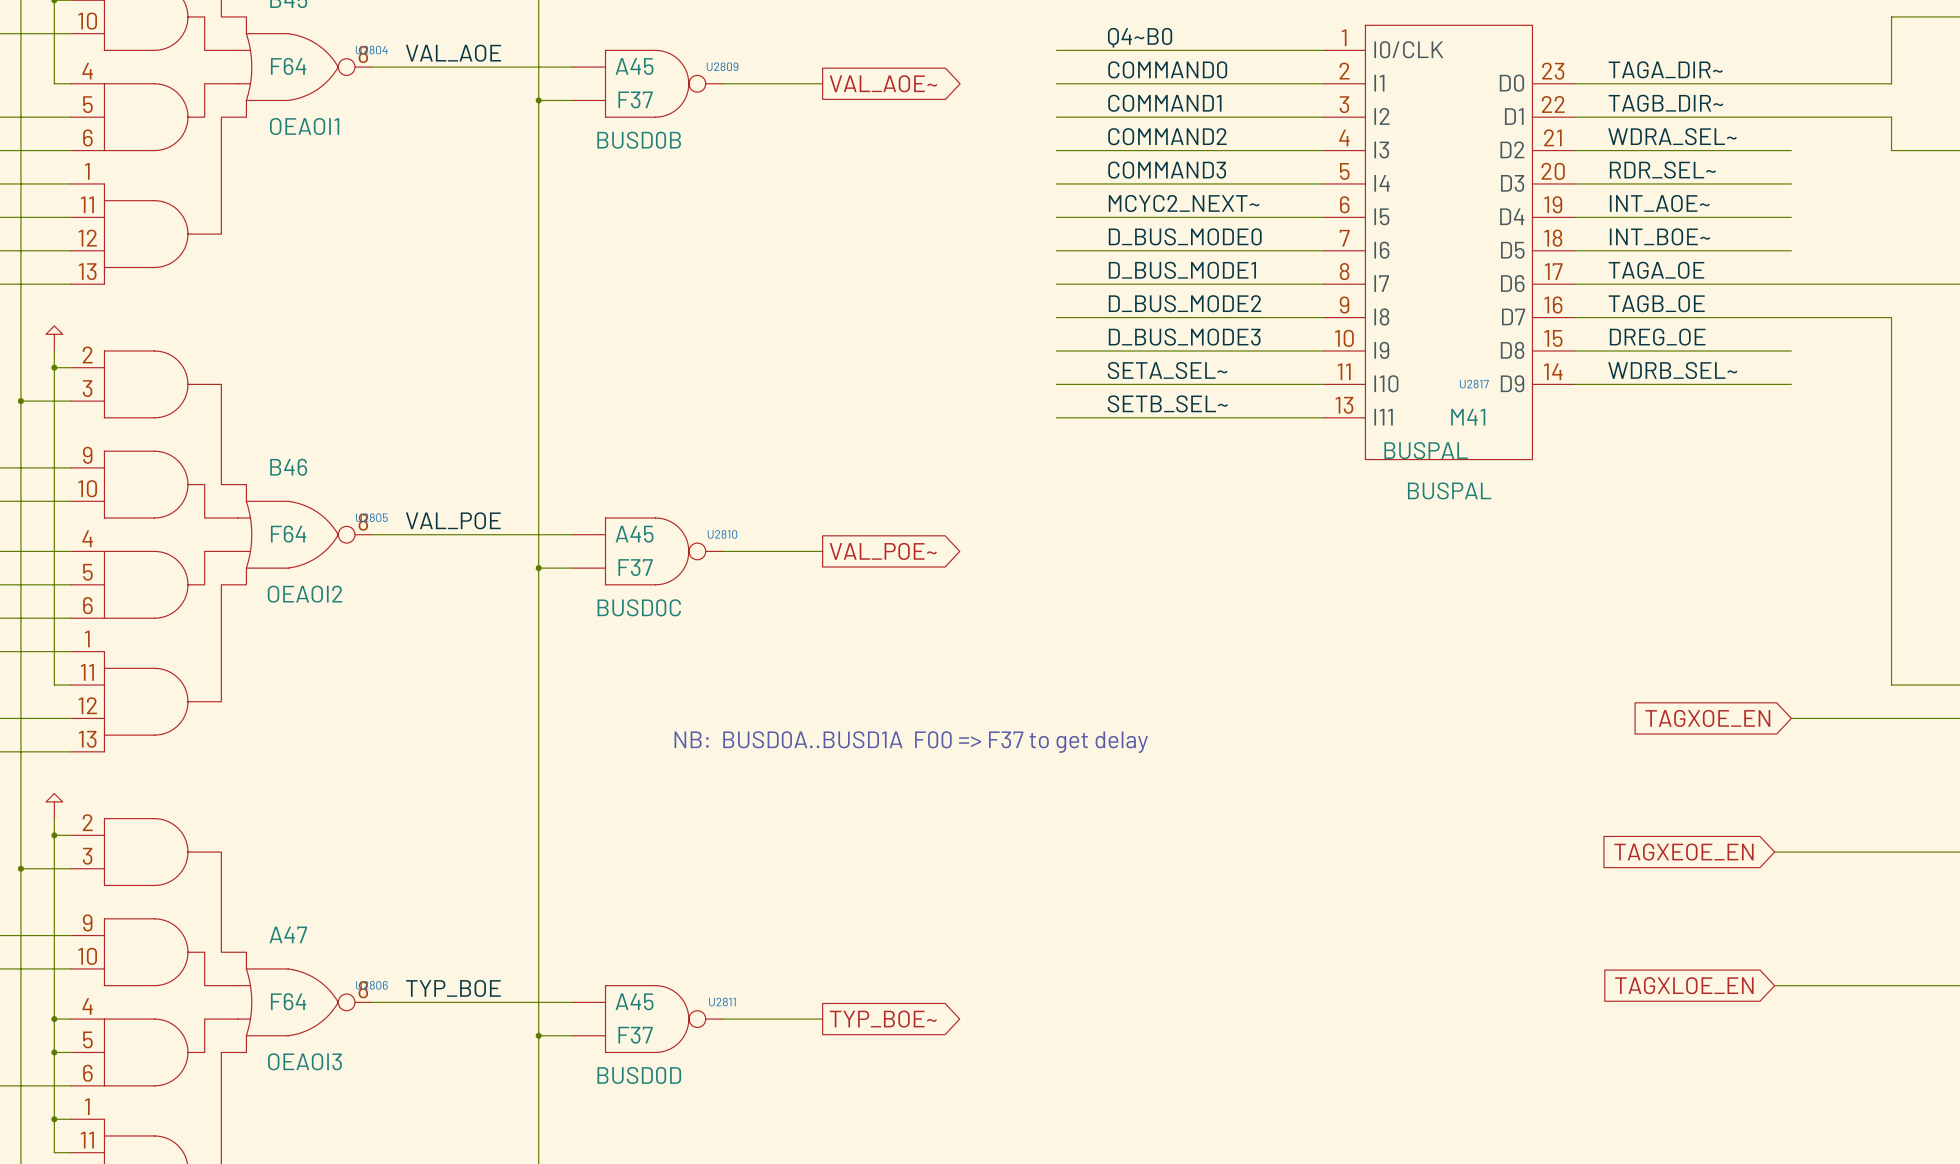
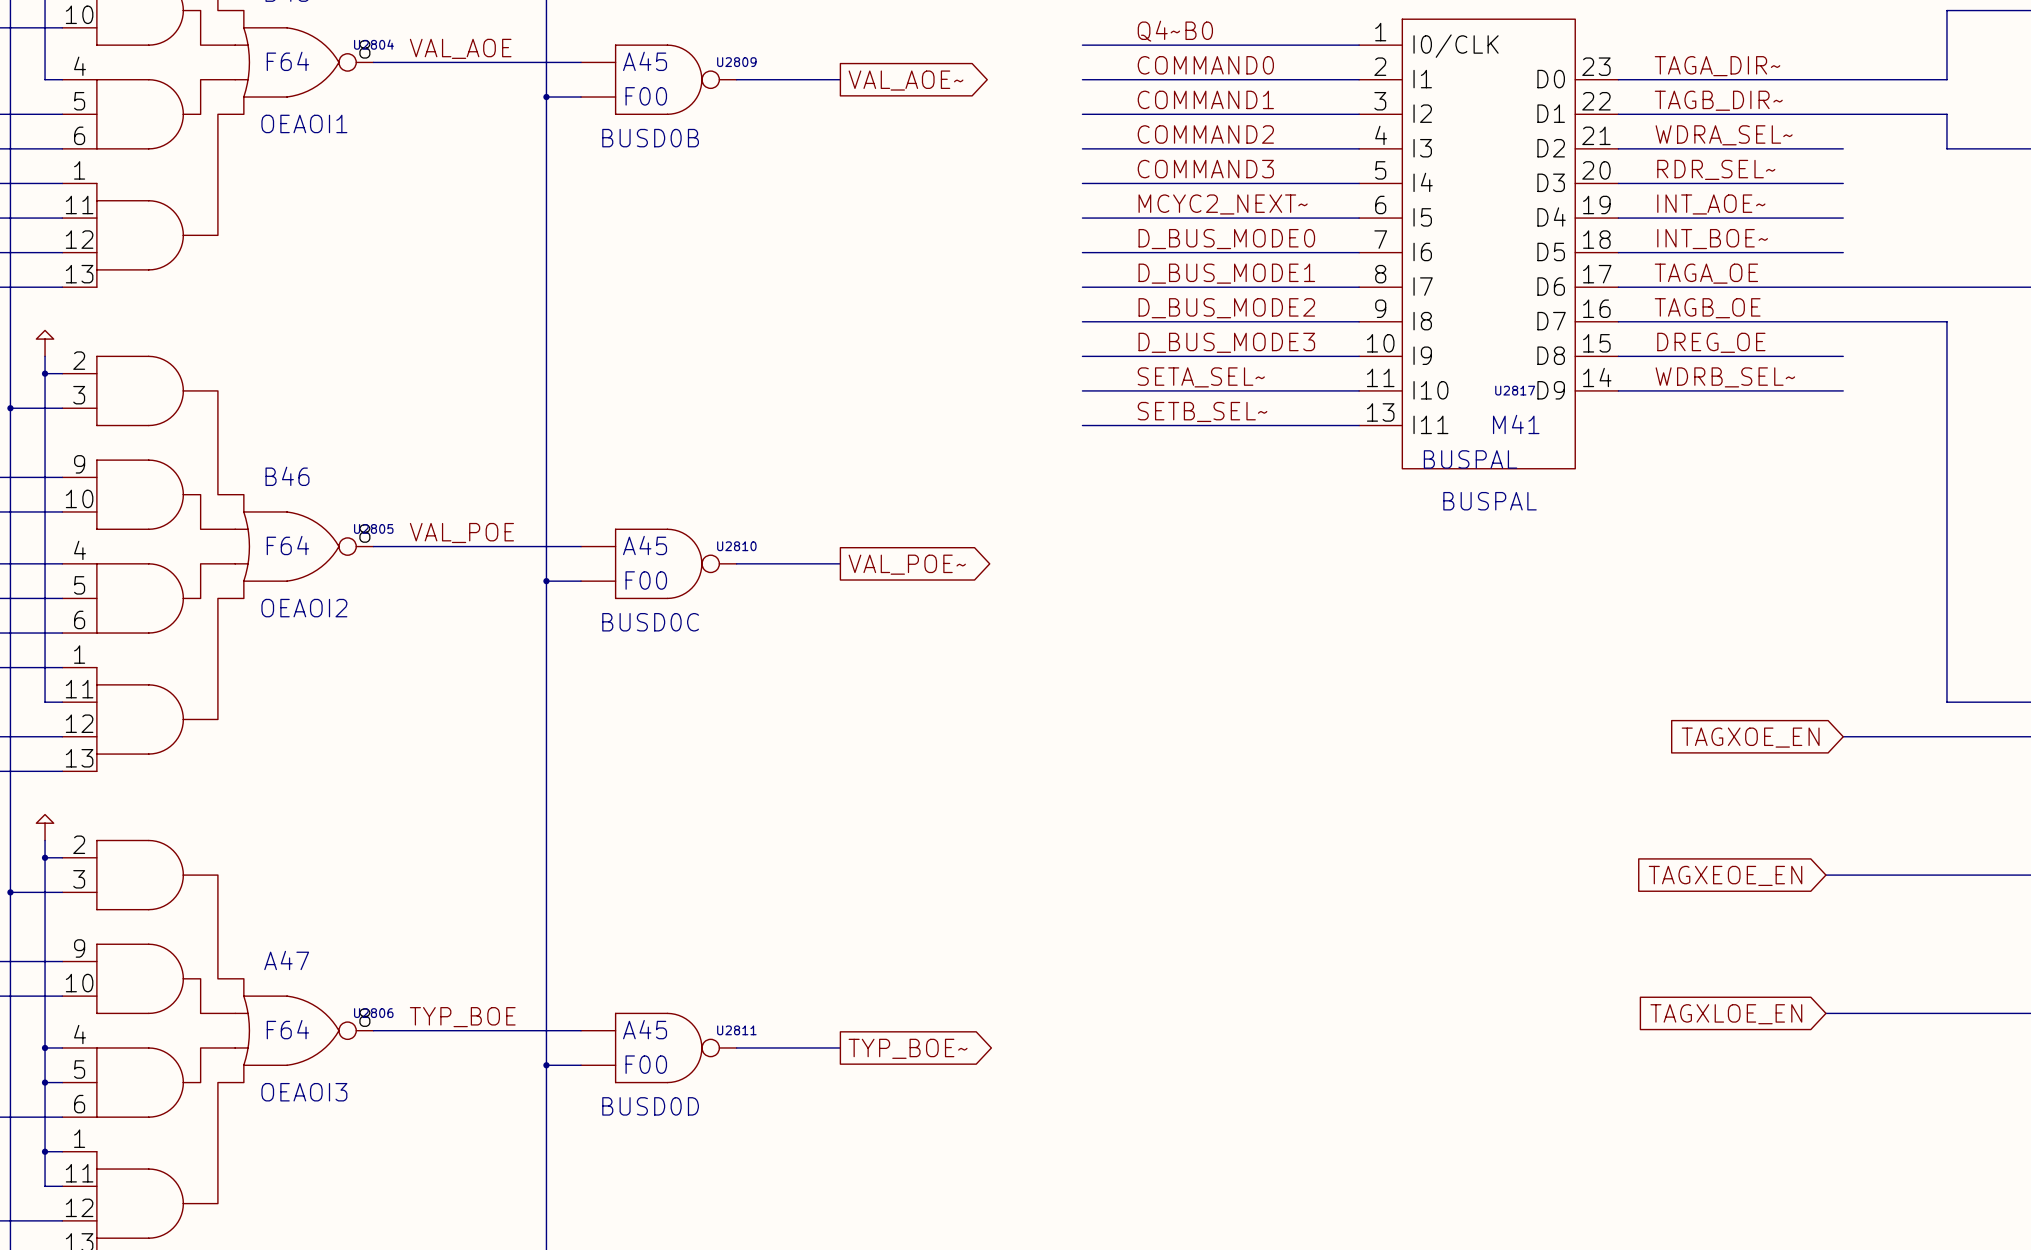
U2809 value: F37 (635, 99) -> F00 (646, 96)
U2810 value: F37 (635, 567) -> F00 (646, 580)
text: NB: BUSD0A..BUSD1A F00 => F37 to get delay (911, 742) -> none
U2811 value: F37 (635, 1035) -> F00 (646, 1064)

